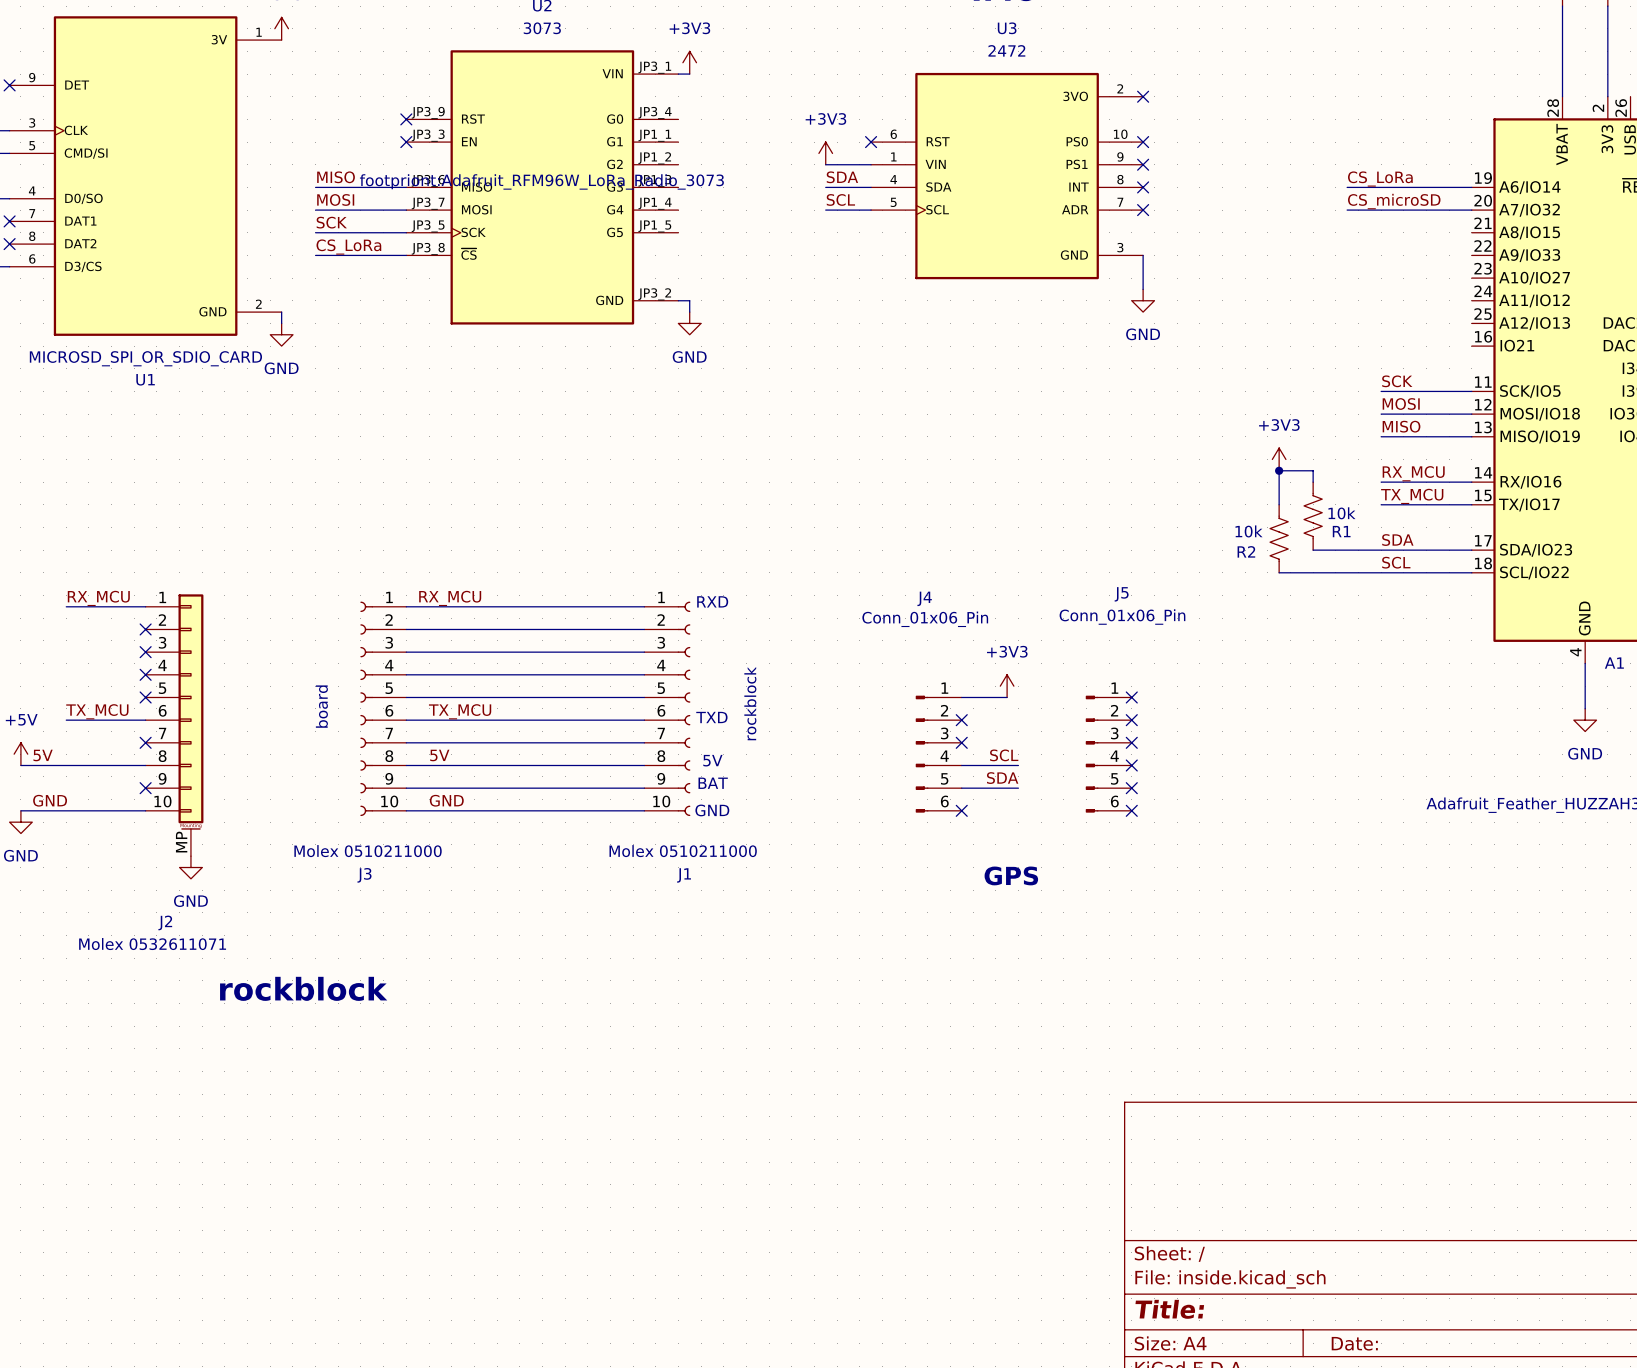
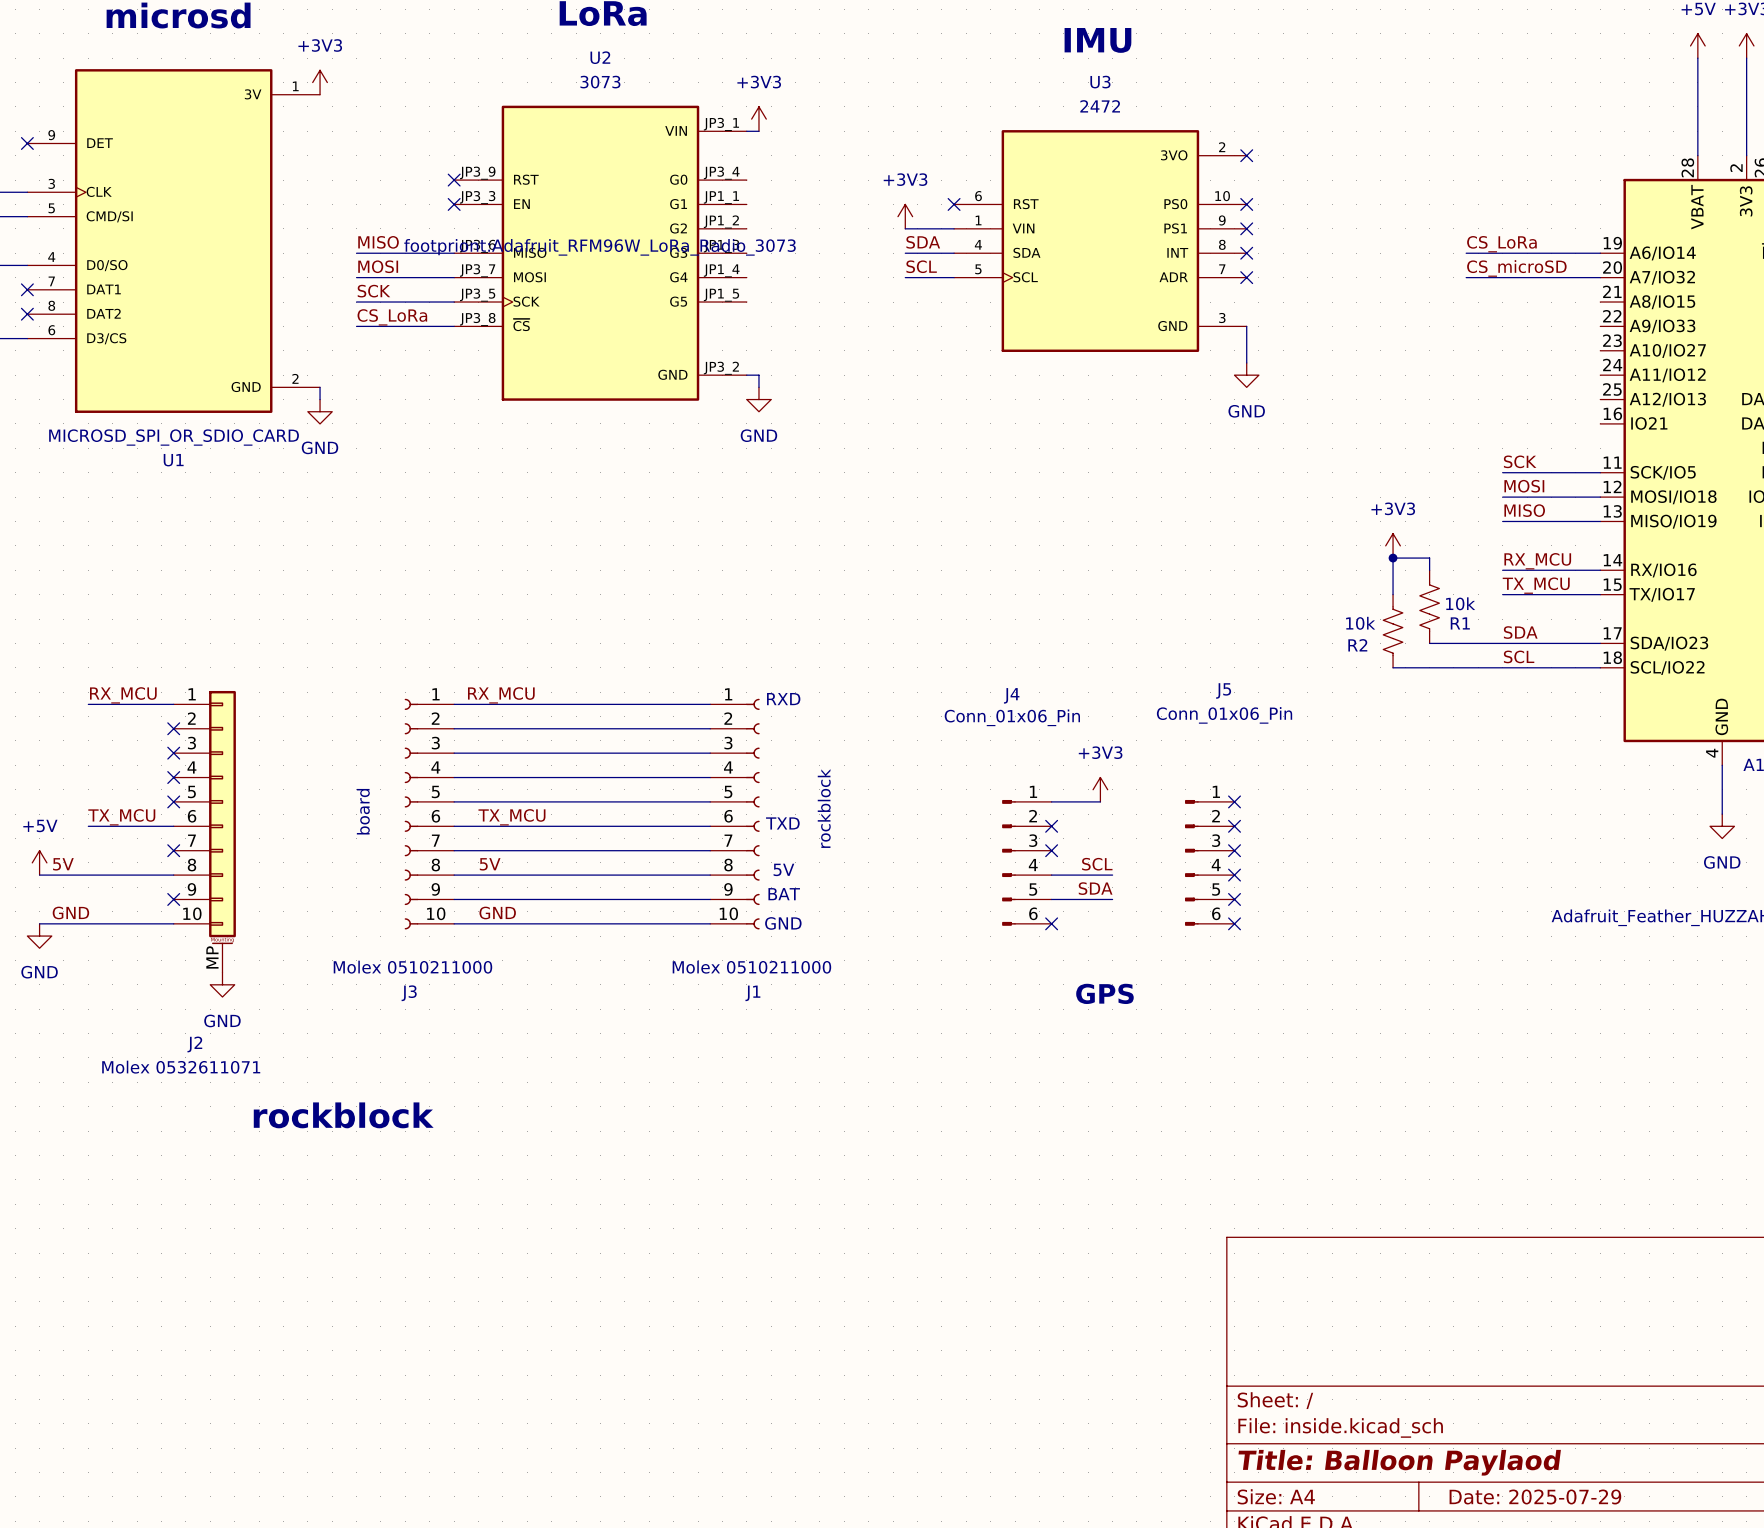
title block: Title: (1169, 1309) -> Title: Balloon Paylaod (1399, 1462)
title block: Date: (1354, 1343) -> Date: 2025-07-29 (1535, 1496)

